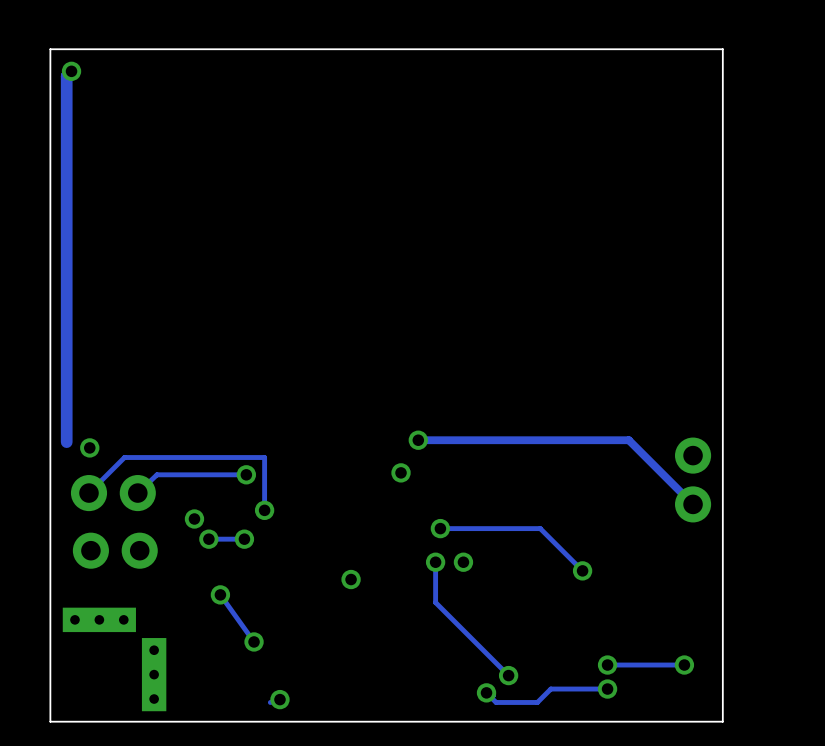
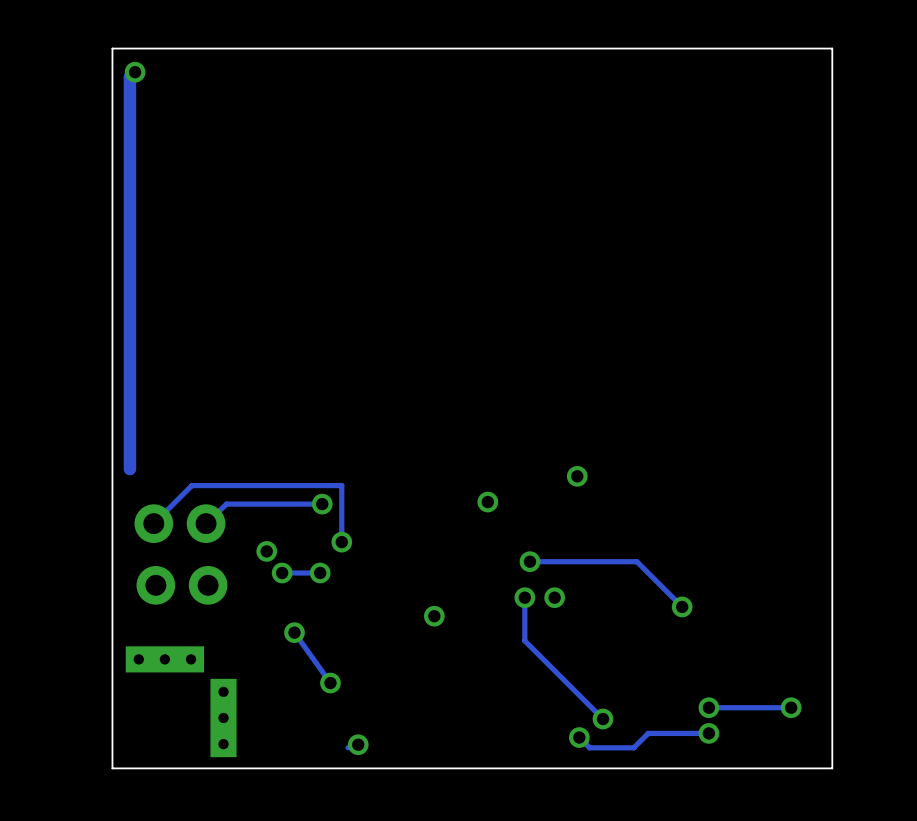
track: (418, 440) (628, 440) (693, 504) -> none
via position: (418, 440) -> (577, 476)
via: (89, 447) -> none
part: (693, 479) -> none

